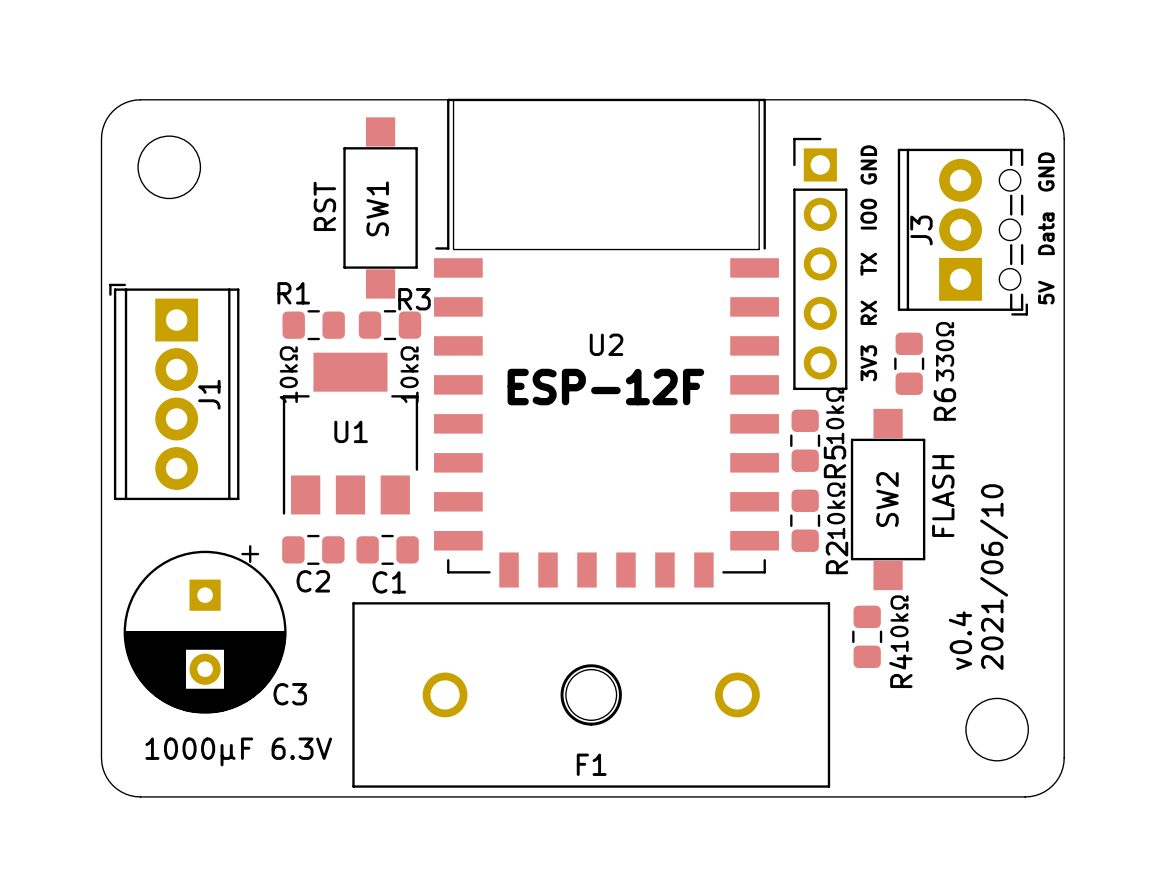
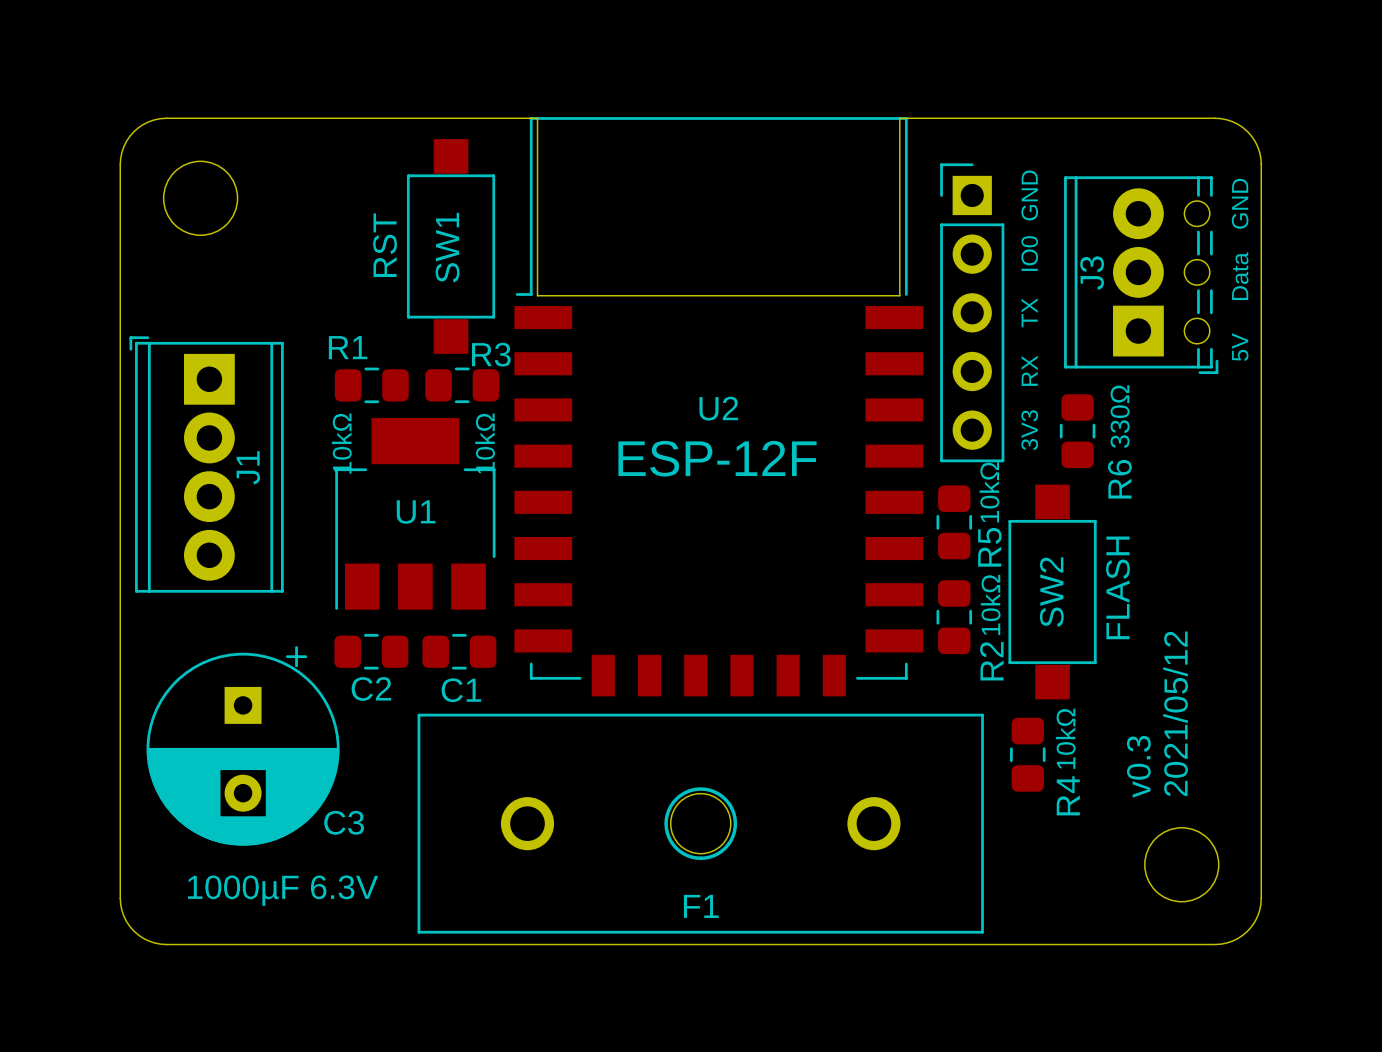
text: 2021/06/10 (994, 577) -> 2021/05/12 (1175, 713)
text: v0.4 (960, 640) -> v0.3 (1138, 766)

